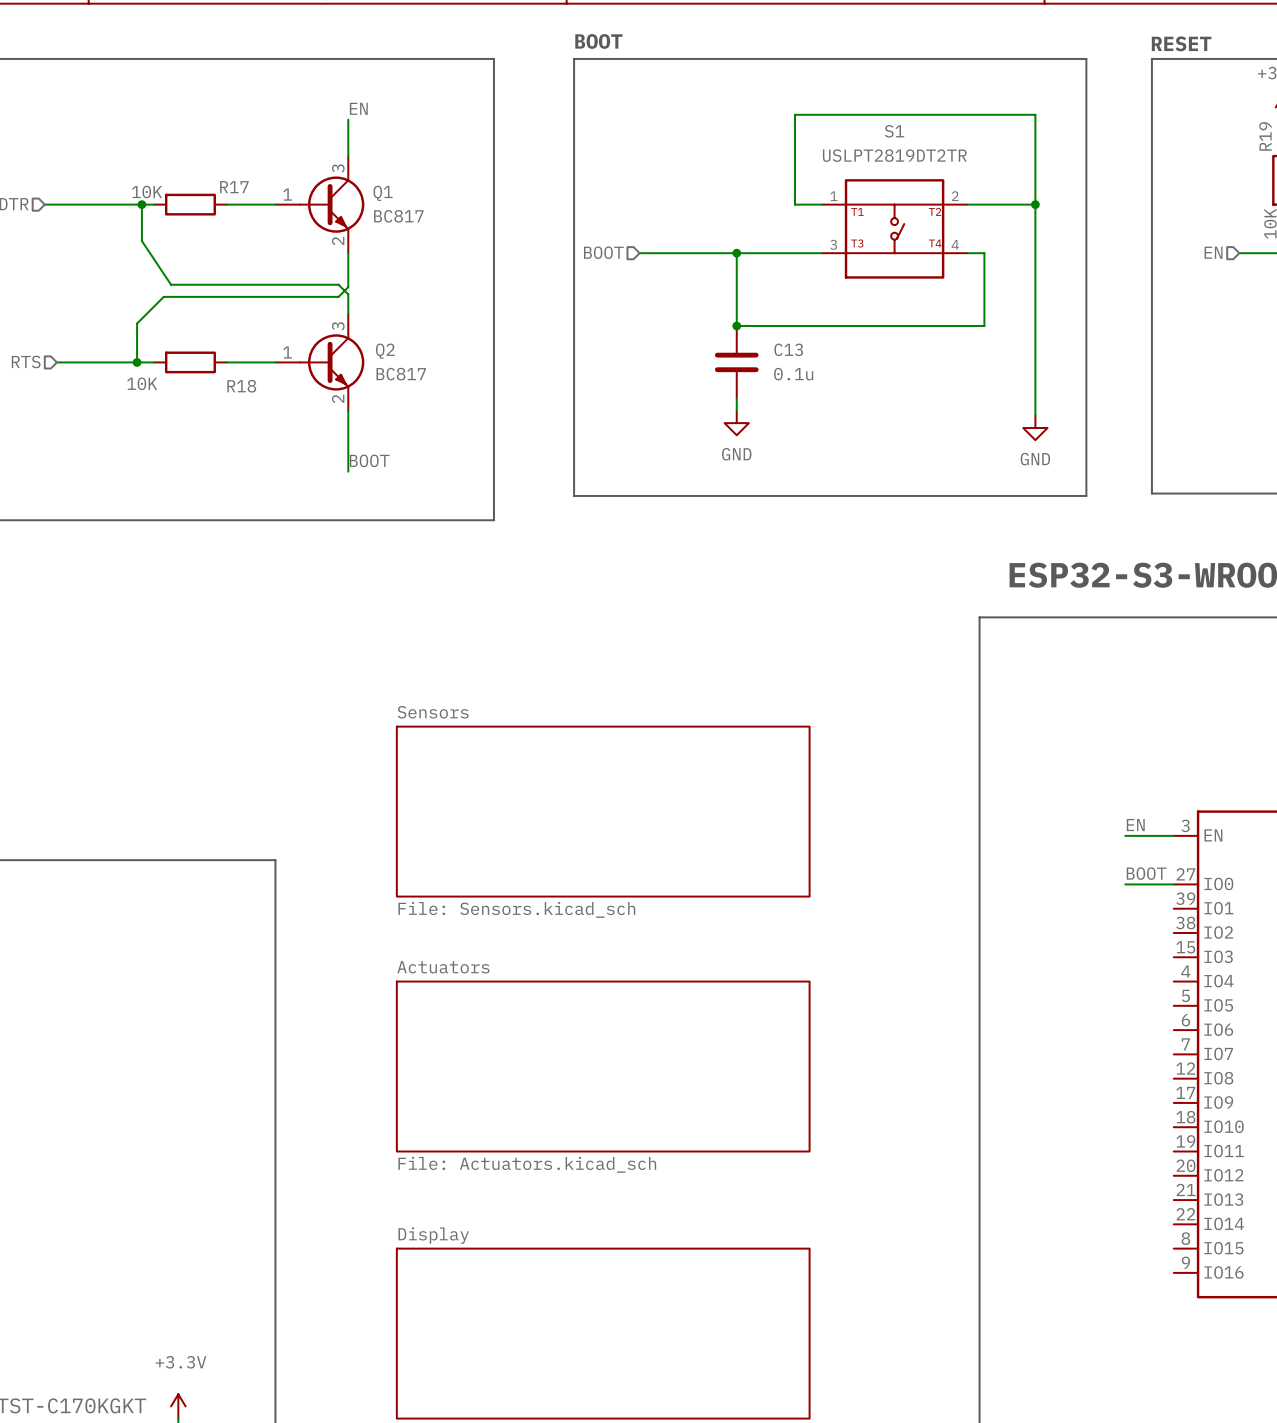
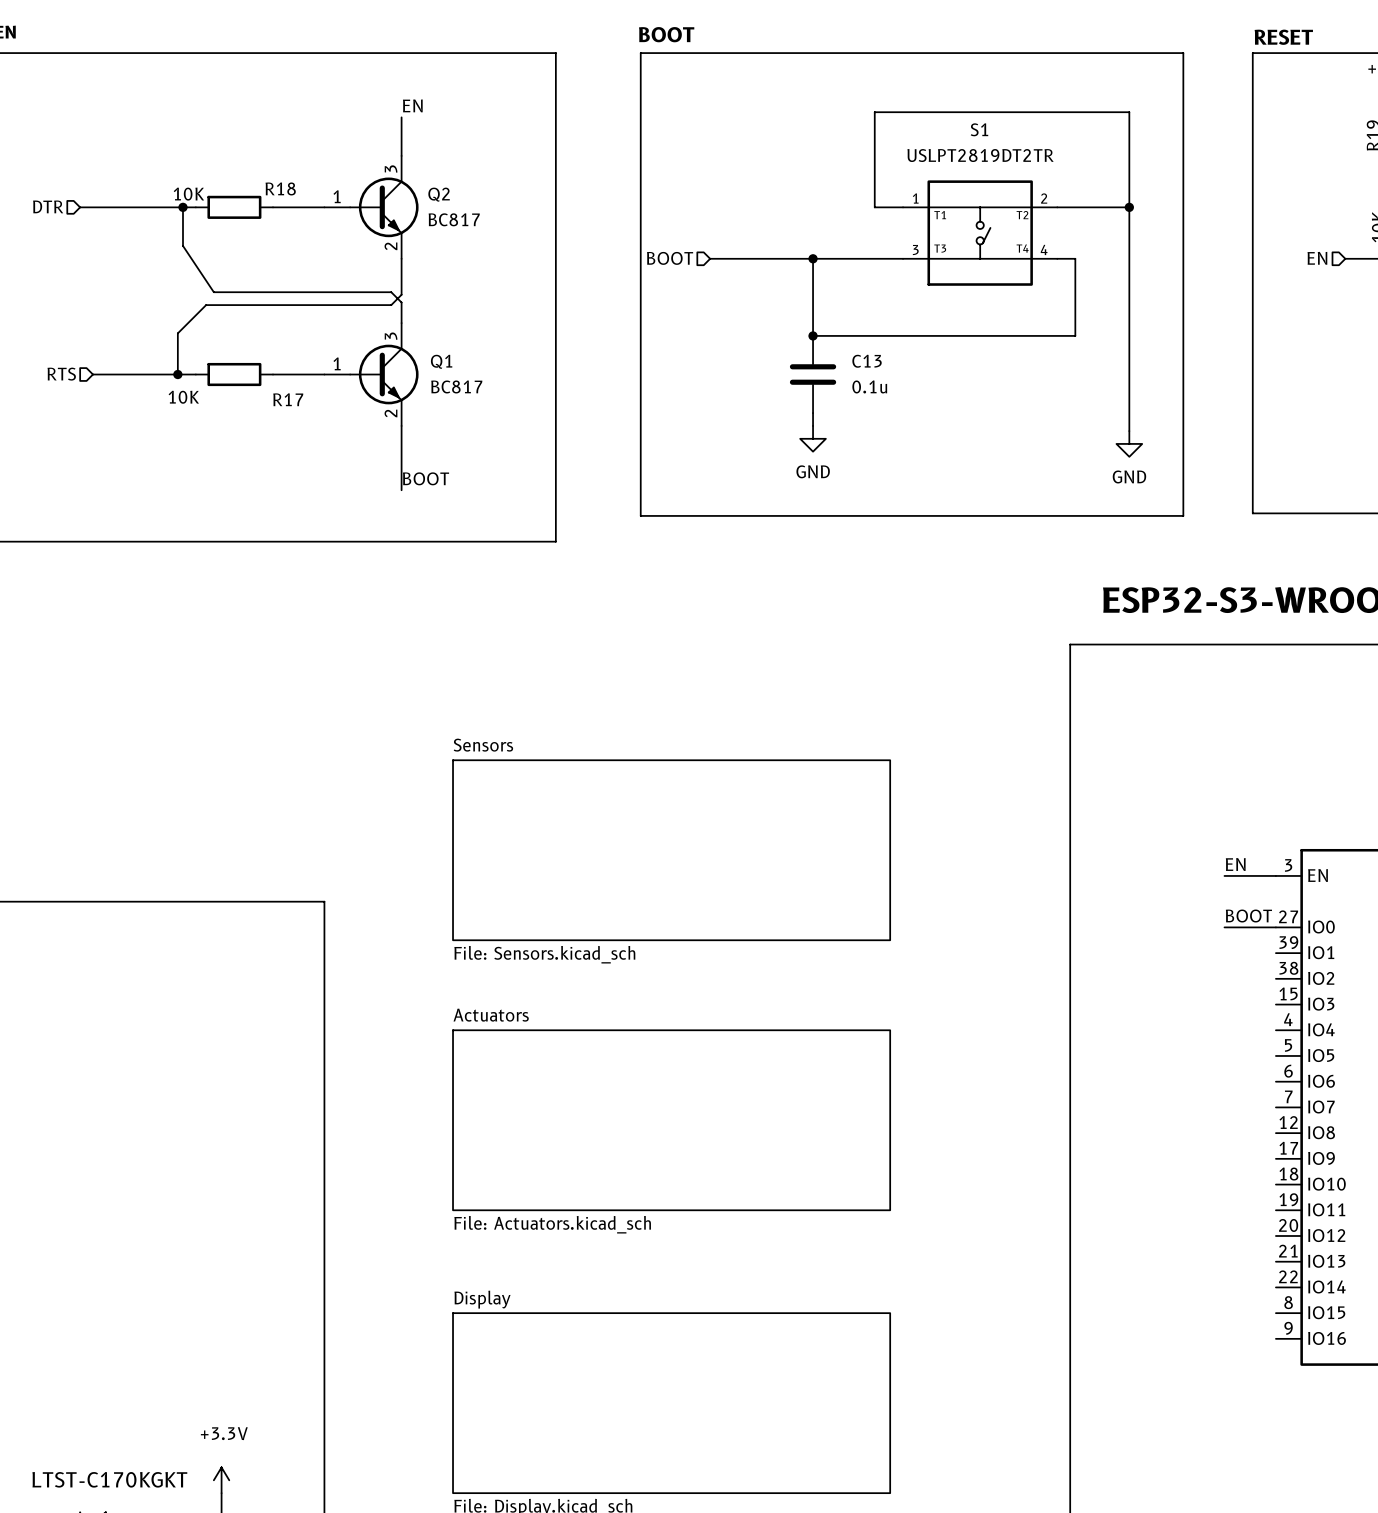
R17 name: R17 (234, 187) -> R18 (280, 188)
Q1 name: Q1 (383, 193) -> Q2 (439, 194)
Q2 name: Q2 (385, 351) -> Q1 (441, 361)
R18 name: R18 (241, 386) -> R17 (288, 399)

